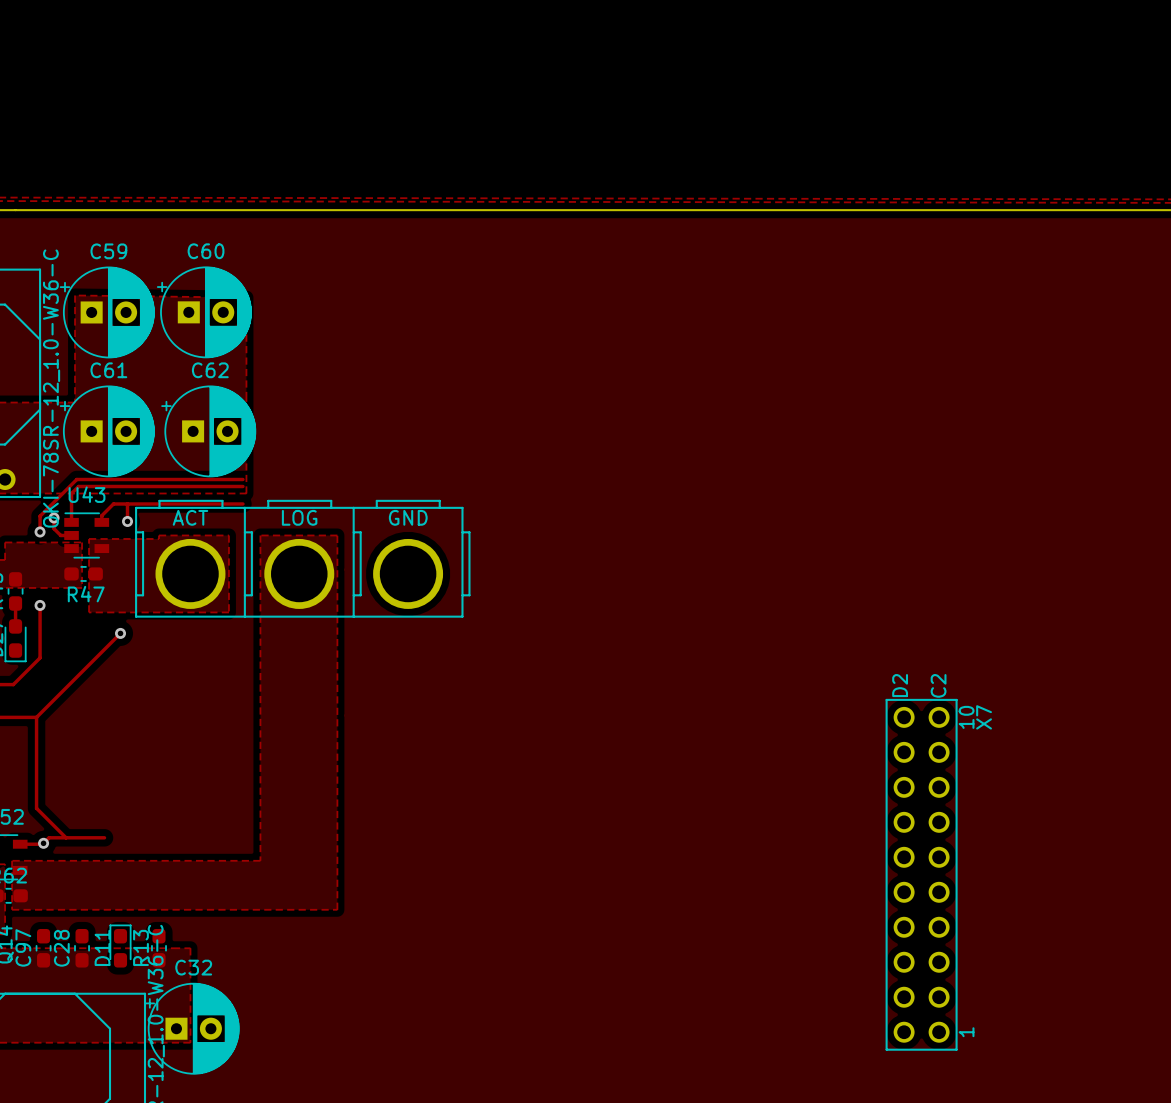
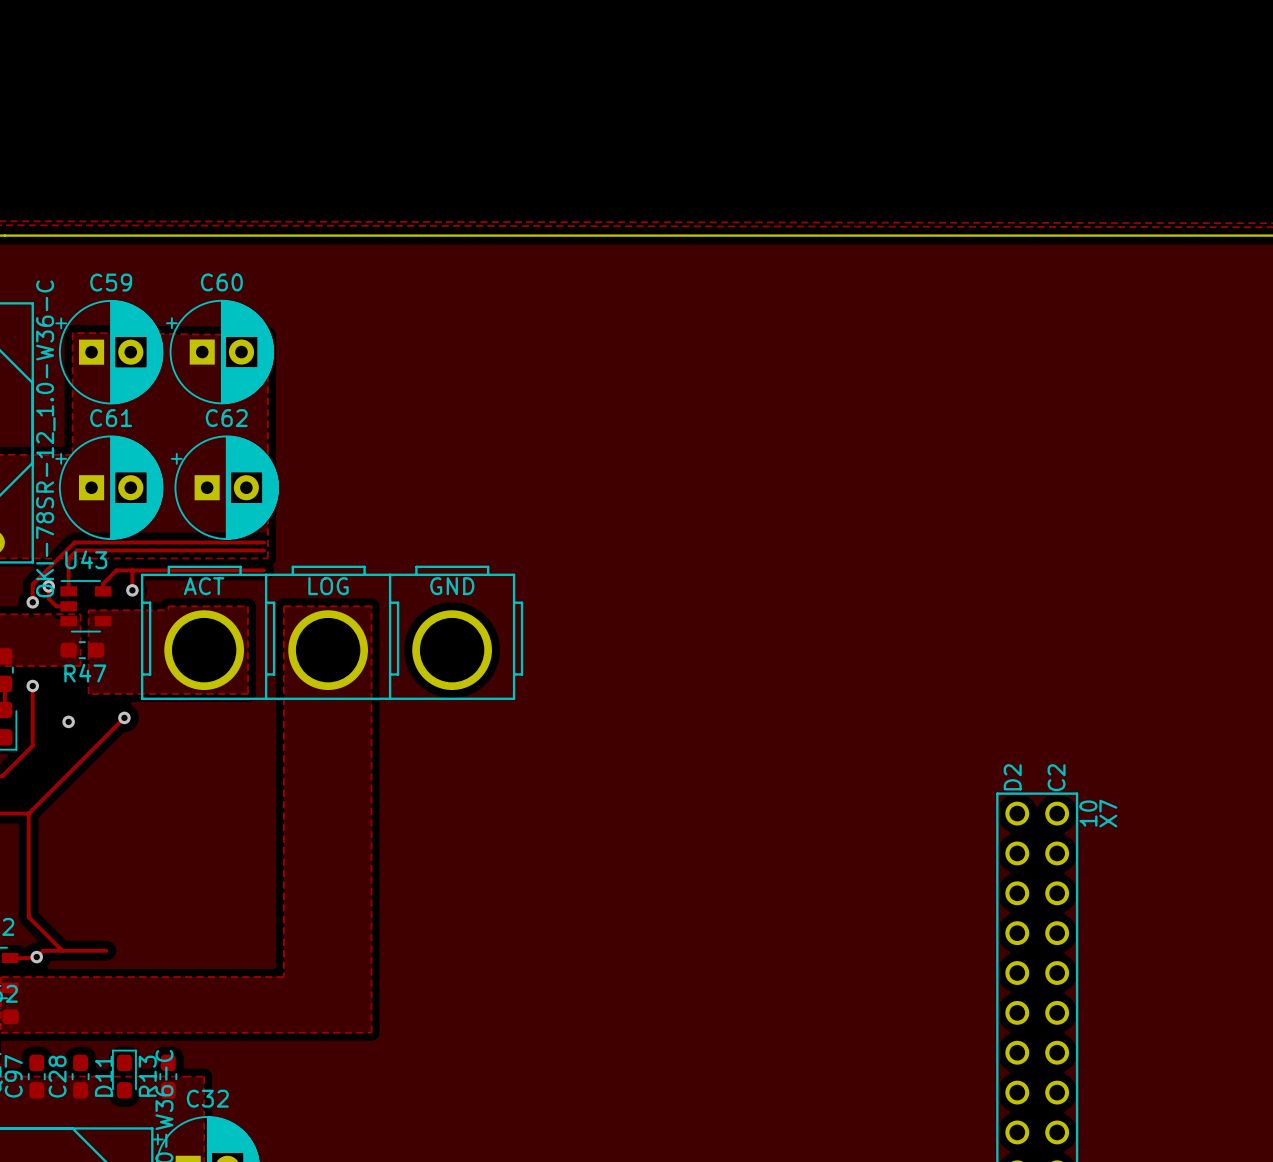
via: none -> (68, 721)

